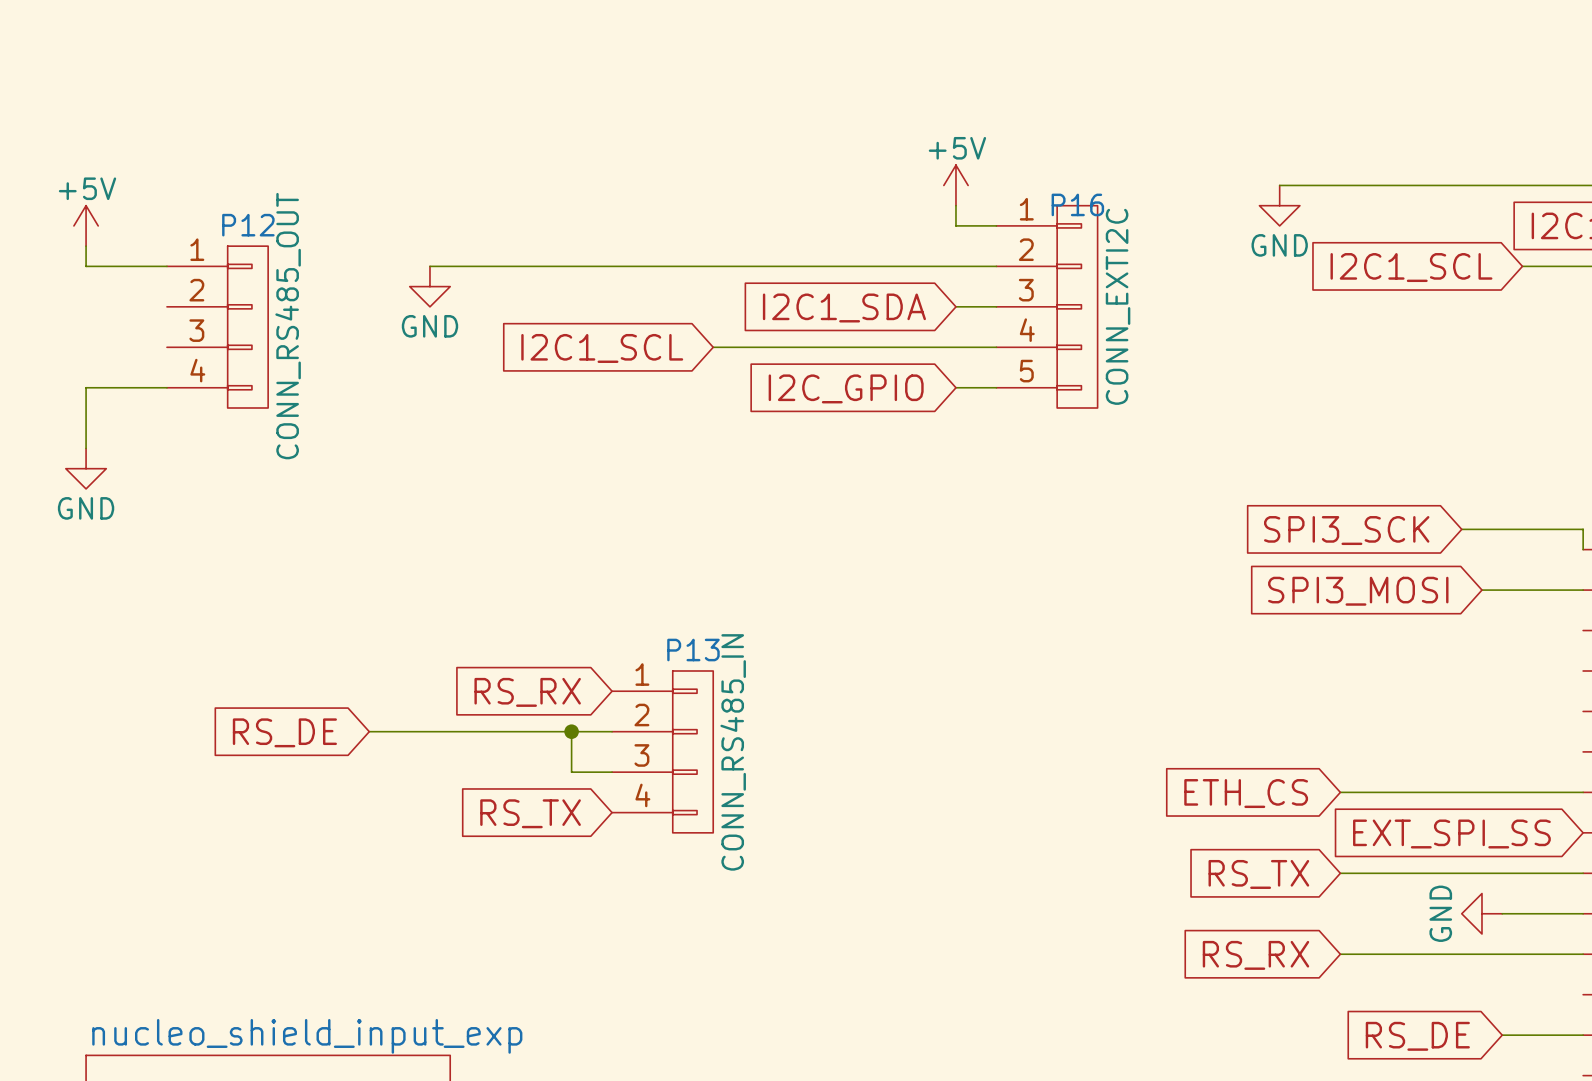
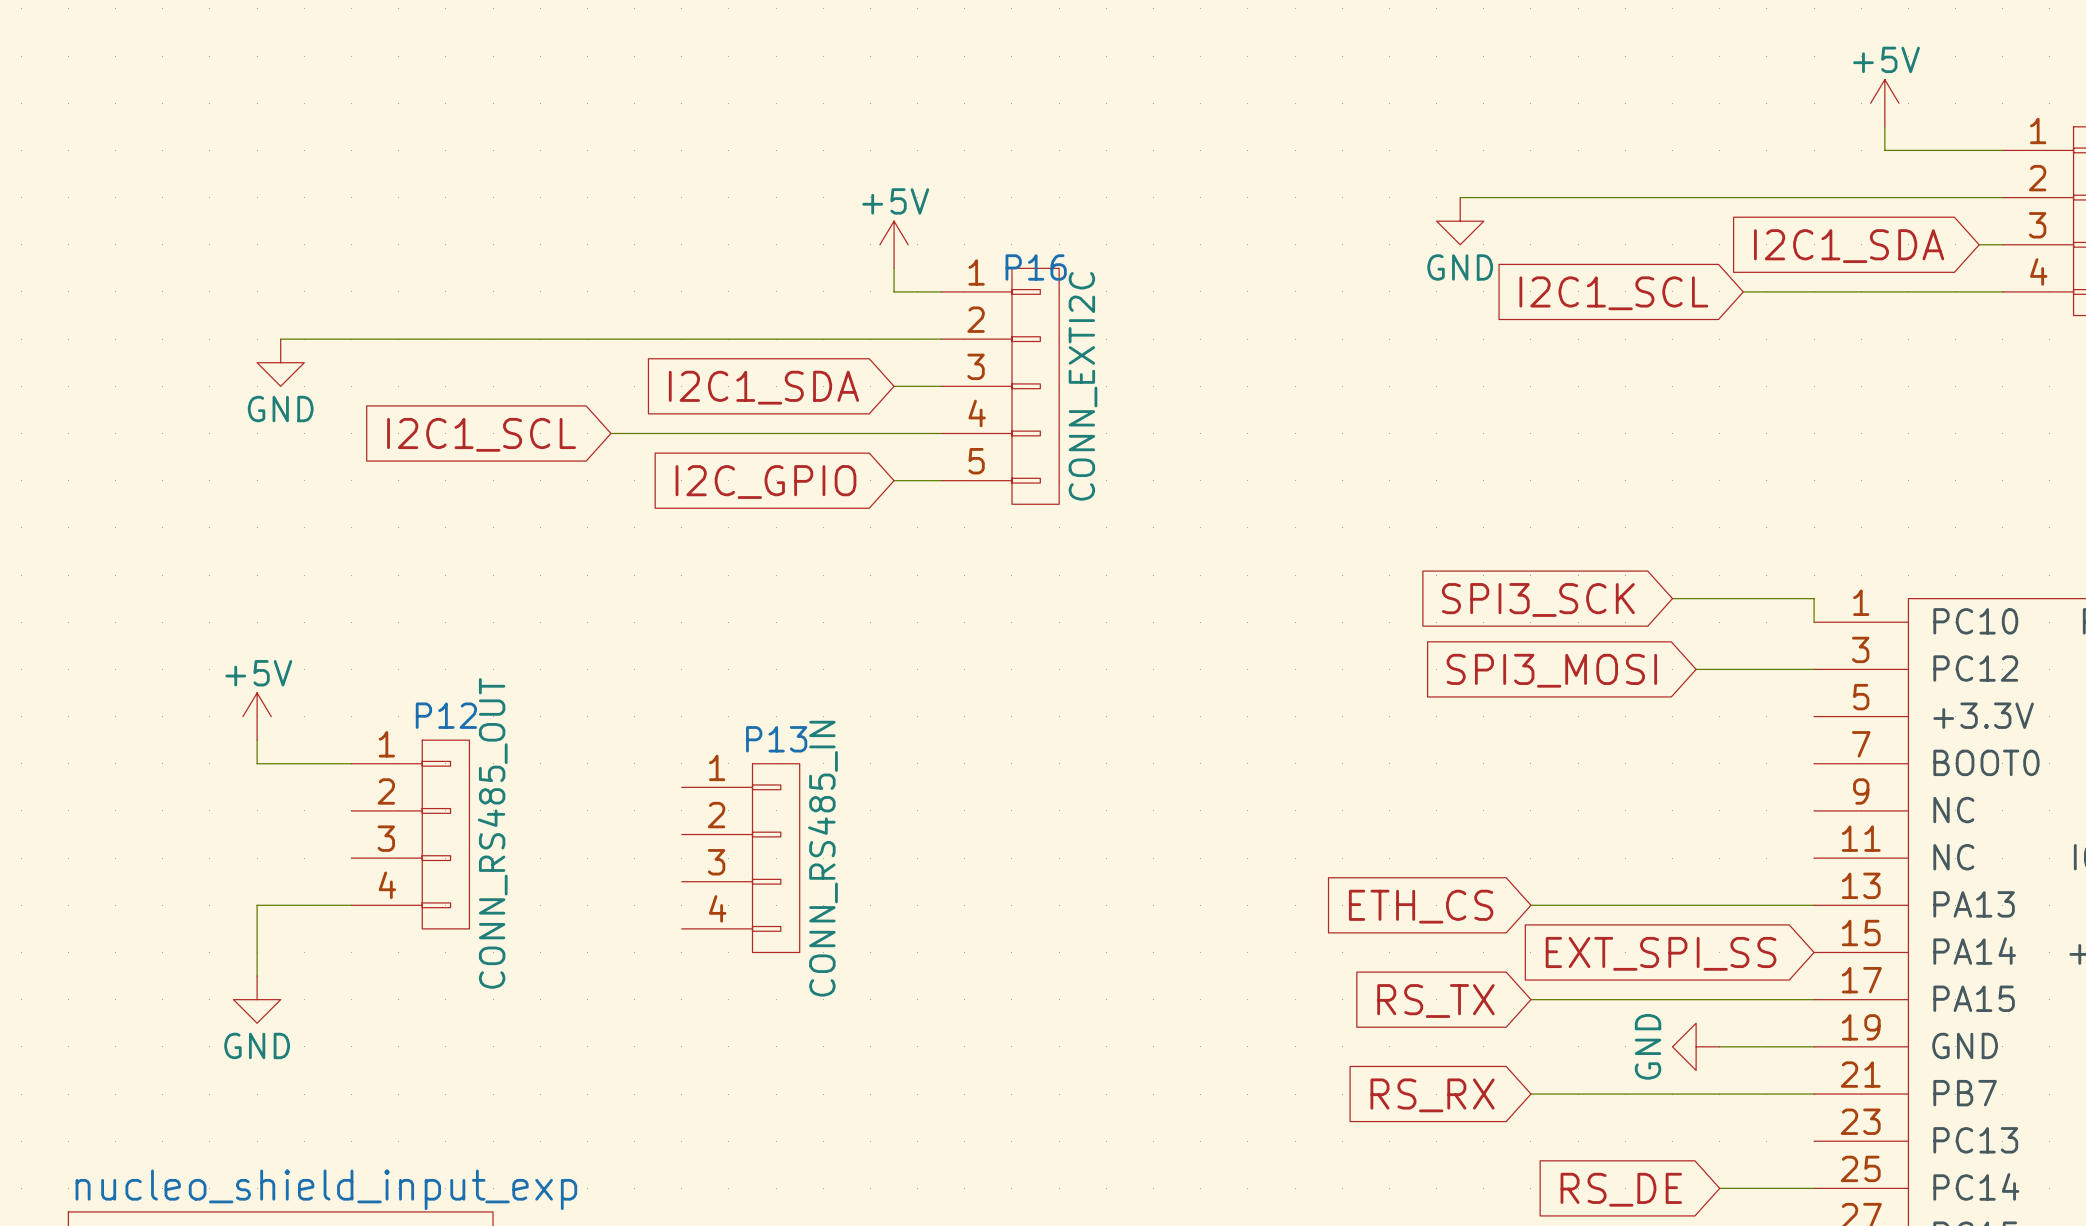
power symbol position: +5V (955, 185) -> +5V (894, 244)
wire: (955, 205) (955, 225) (996, 225) -> none
power symbol: +5V (86, 225) -> none
wire: (86, 246) (86, 266) (166, 266) -> none
wire: (429, 266) (794, 266) -> (894, 268) (894, 291)
wire: (834, 266) (996, 266) -> none
power symbol: GND (429, 286) -> none
wire: none -> (280, 339) (941, 339)
wire: (955, 306) (996, 306) -> none
P16 position: (1047, 306) -> (1000, 386)
global label position: I2C1_SDA (844, 308) -> I2C1_SDA (763, 387)
P12 position: (217, 327) -> (410, 834)
power symbol: none -> GND (280, 362)
wire: (713, 347) (794, 347) -> none
wire: (834, 347) (996, 347) -> none
global label position: I2C1_SCL (602, 348) -> I2C1_SCL (481, 434)
wire: (166, 387) (86, 387) (86, 448) -> none
wire: none -> (610, 433) (941, 433)
wire: (955, 387) (996, 387) -> (894, 480) (941, 480)
global label position: I2C_GPIO (846, 388) -> I2C_GPIO (765, 482)
power symbol: GND (86, 468) -> none
power symbol: none -> +5V (257, 716)
wire: none -> (257, 740) (257, 763) (351, 763)
global label: RS_RX (527, 692) -> none
wire: (369, 731) (612, 731) -> none
wire: (571, 731) (571, 772) (612, 772) -> none
junction: (571, 731) -> none
global label: RS_DE (284, 732) -> none
wire: none -> (351, 905) (257, 905) (257, 976)
global label: RS_TX (530, 813) -> none
power symbol: none -> GND (257, 999)

